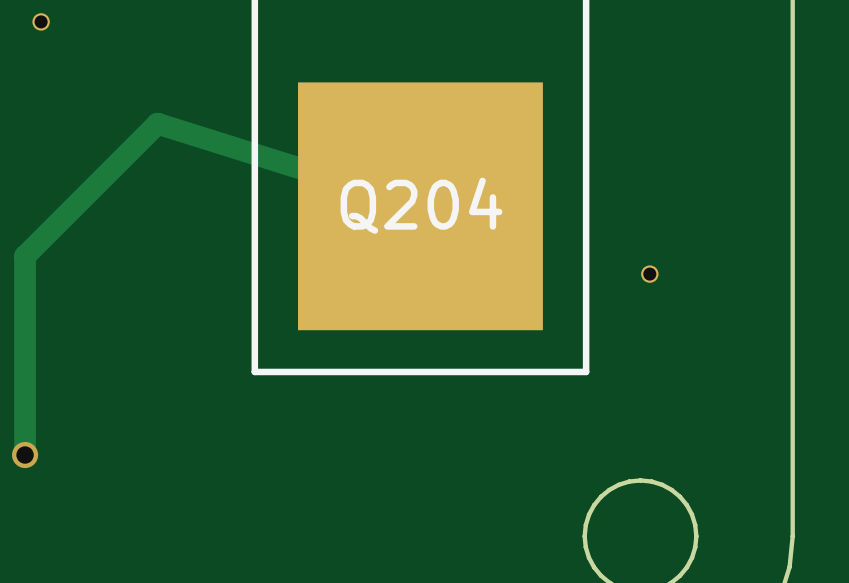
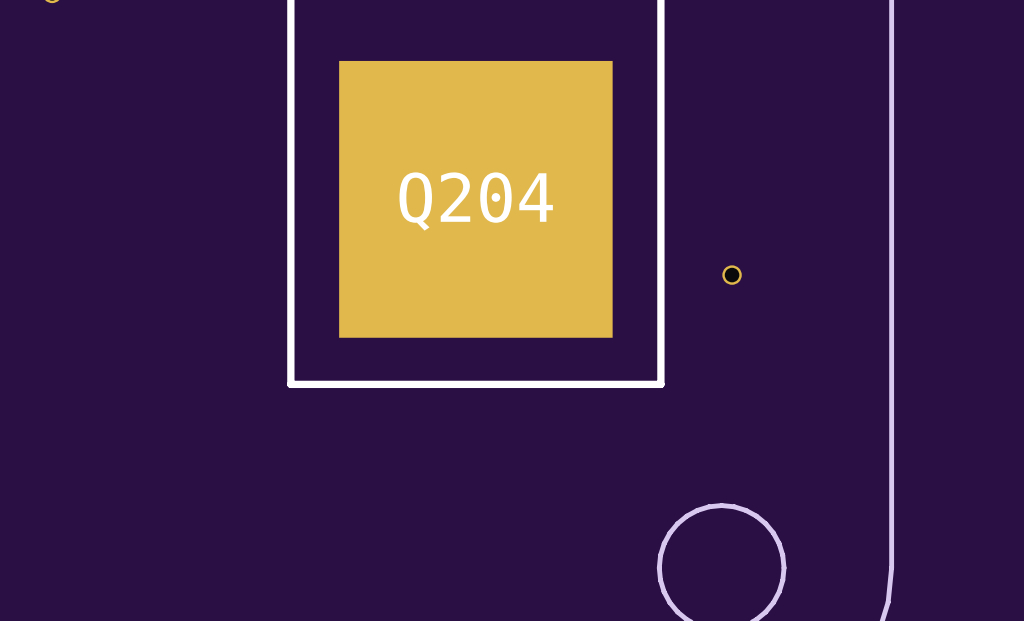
track: (420, 206) (157, 123) (25, 256) (25, 455) -> none
via: (25, 455) -> none

